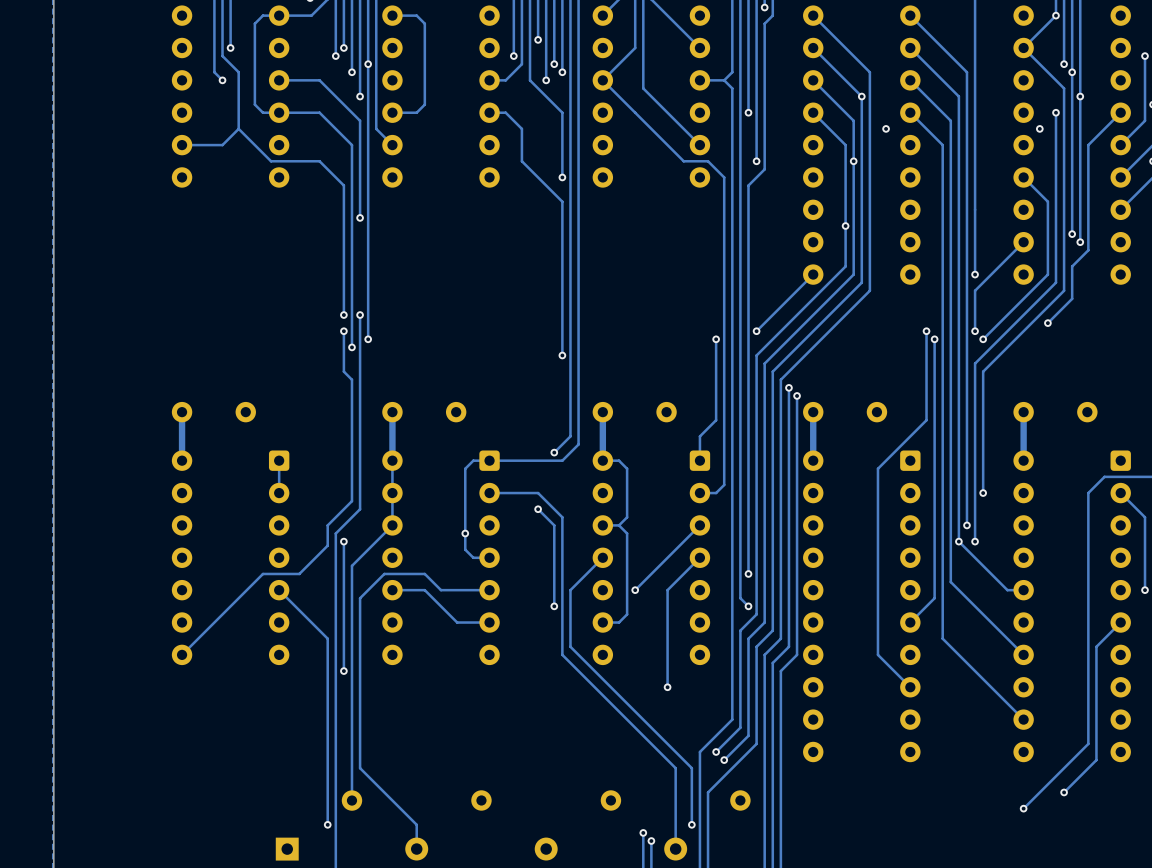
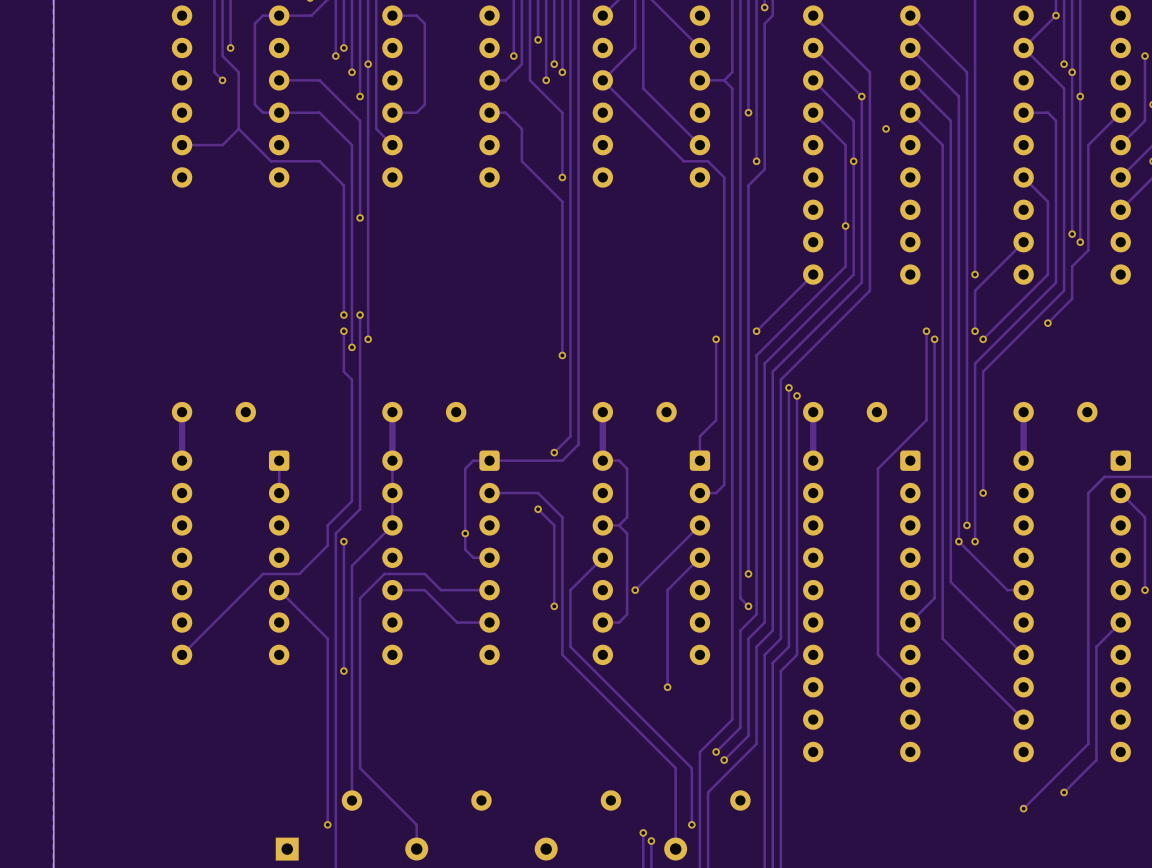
track: (1055, 112) (1055, 120) -> (1023, 112) (1047, 112) (1055, 120)
via: (1055, 112) -> none
via: (1039, 128) -> none

